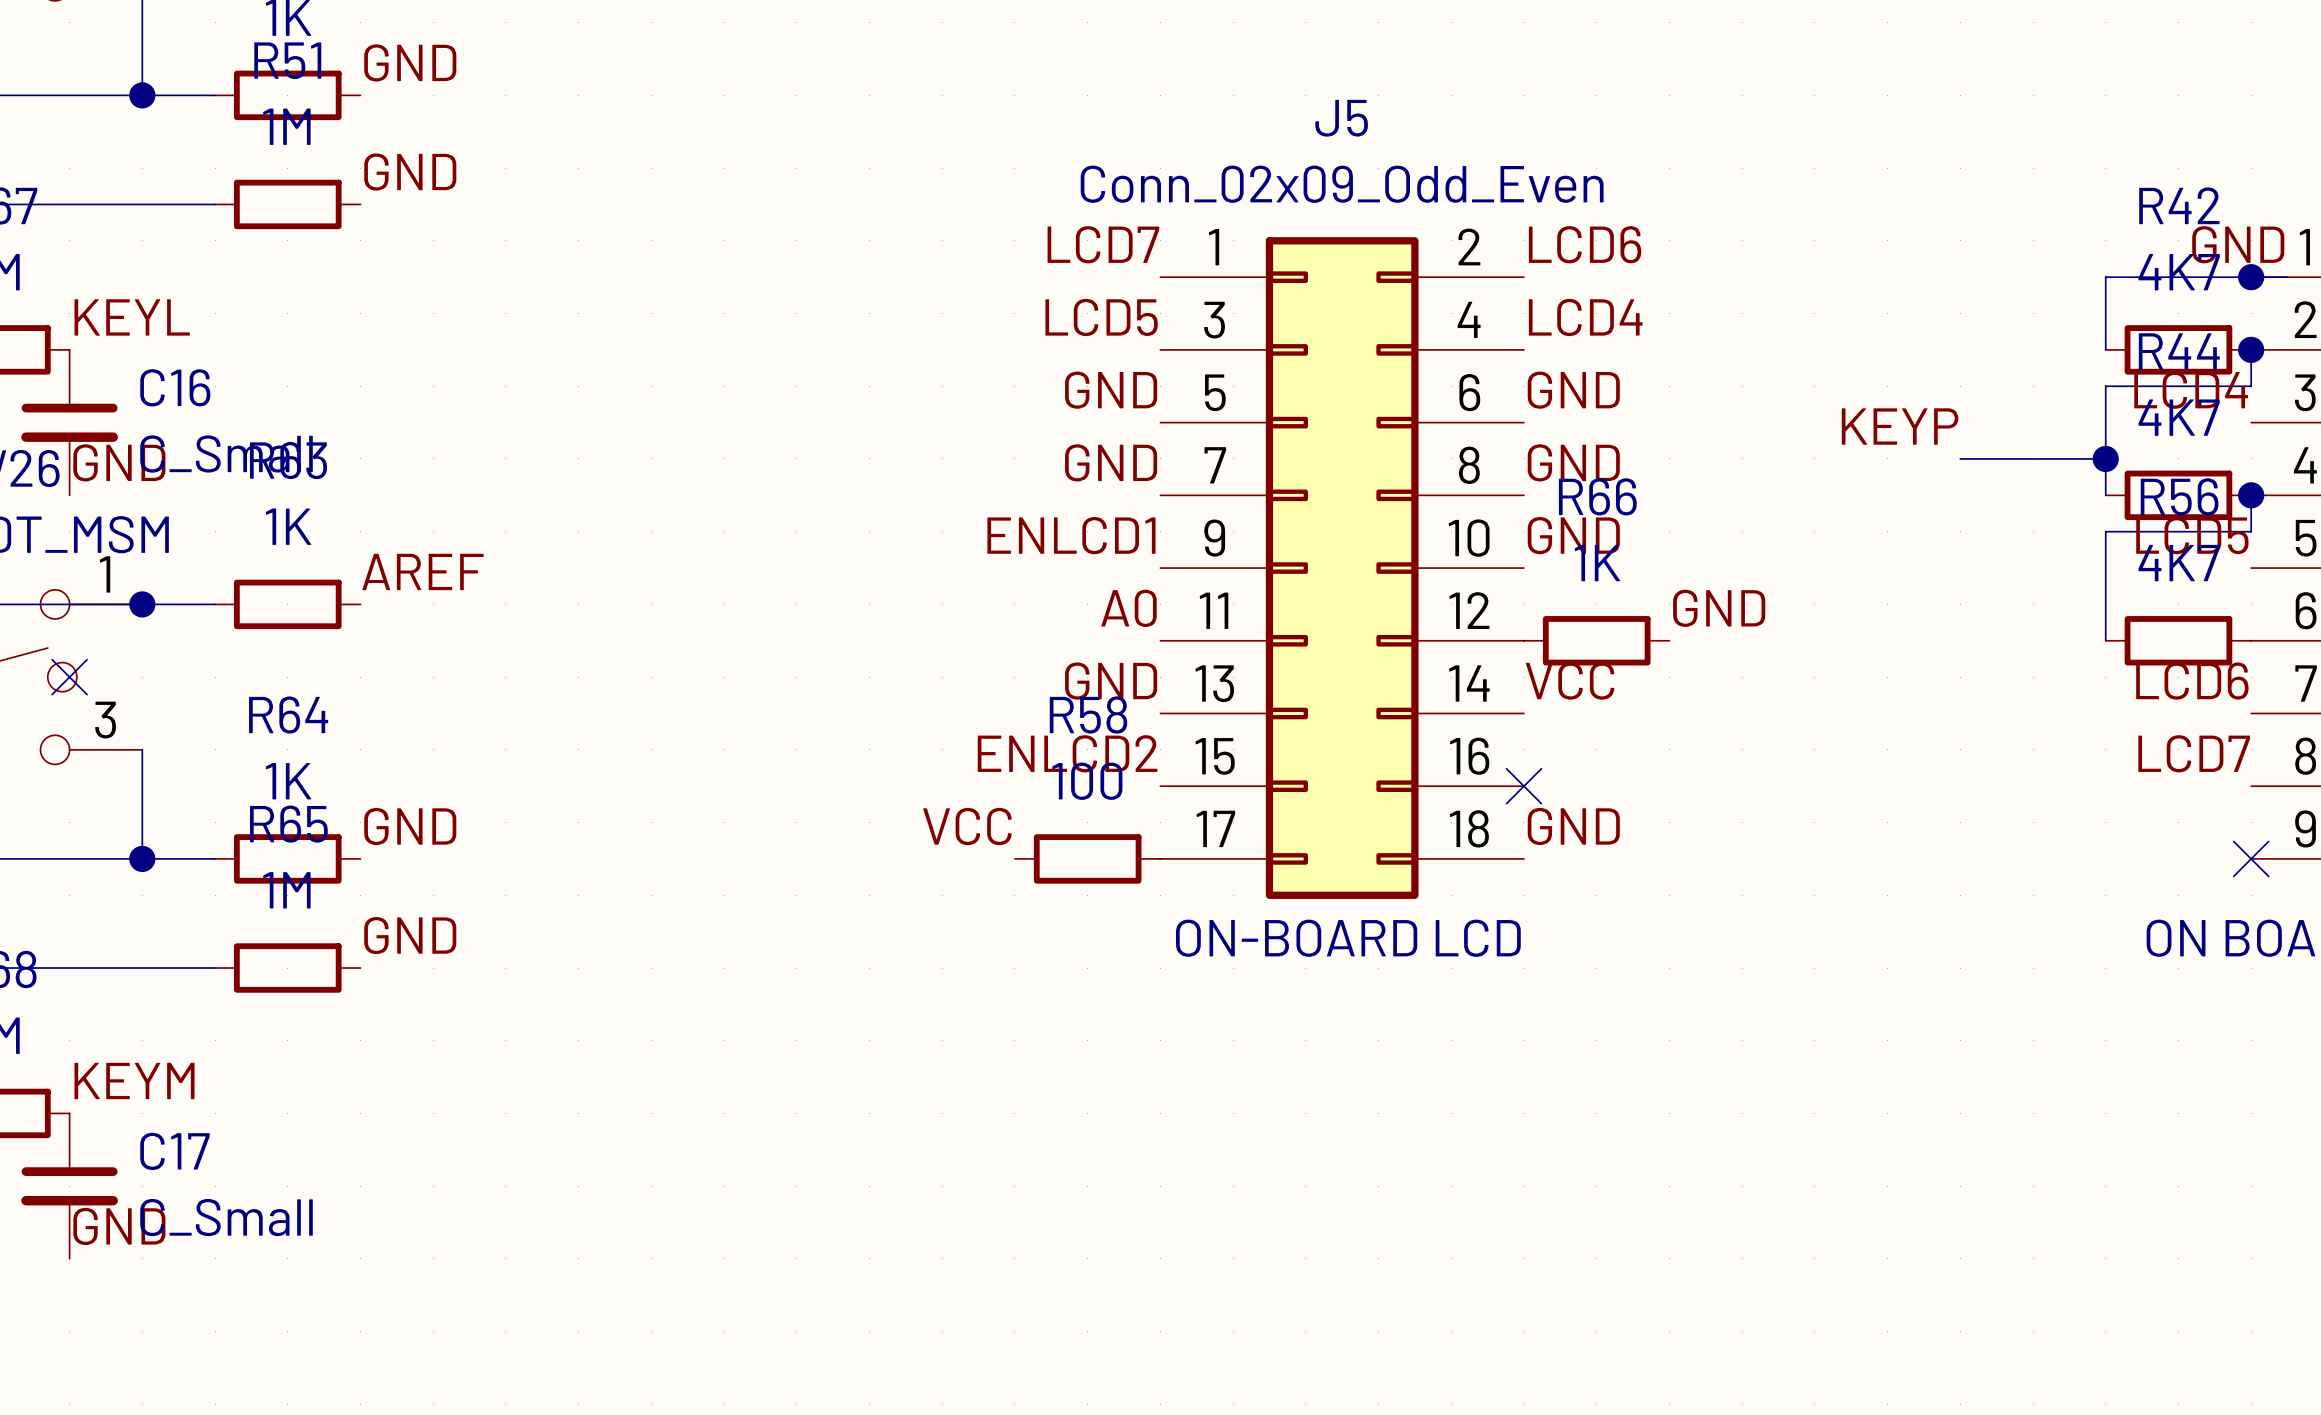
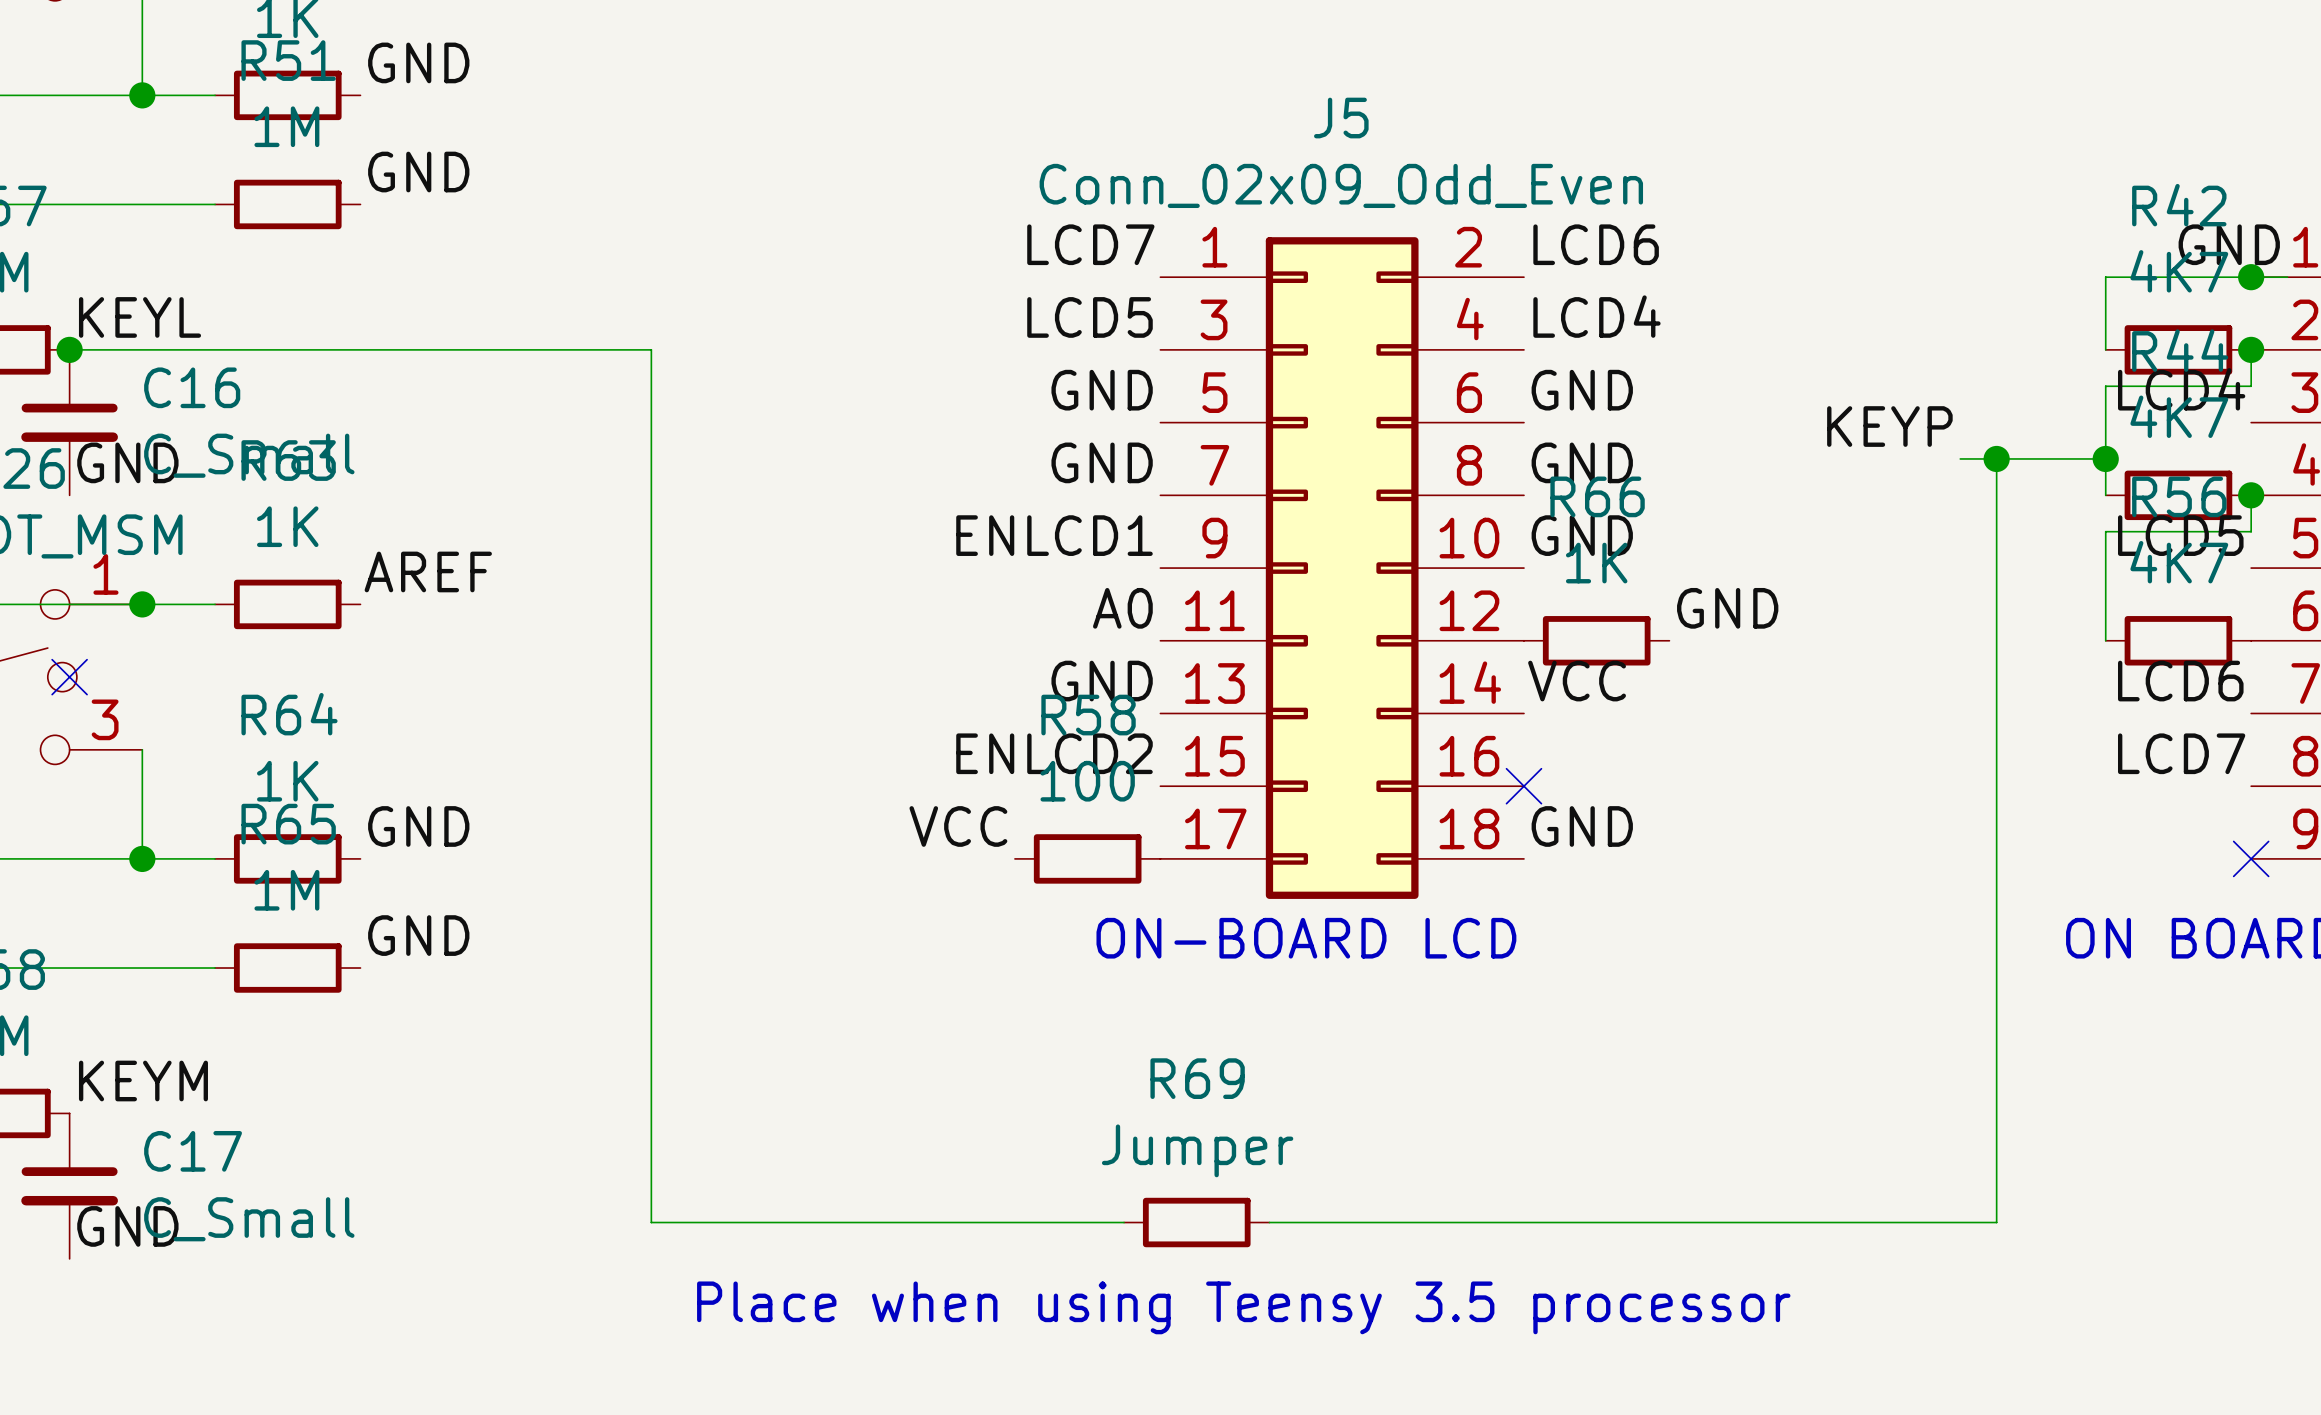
wire: none -> (69, 349) (651, 349) (651, 1222) (1124, 1222)
junction: none -> (69, 349)
wire: none -> (1996, 458) (1996, 1222) (1269, 1222)
junction: none -> (1996, 458)
R69: none -> Jumper (1196, 1222)
text: none -> Place when using Teensy 3.5 processor (1243, 1307)

